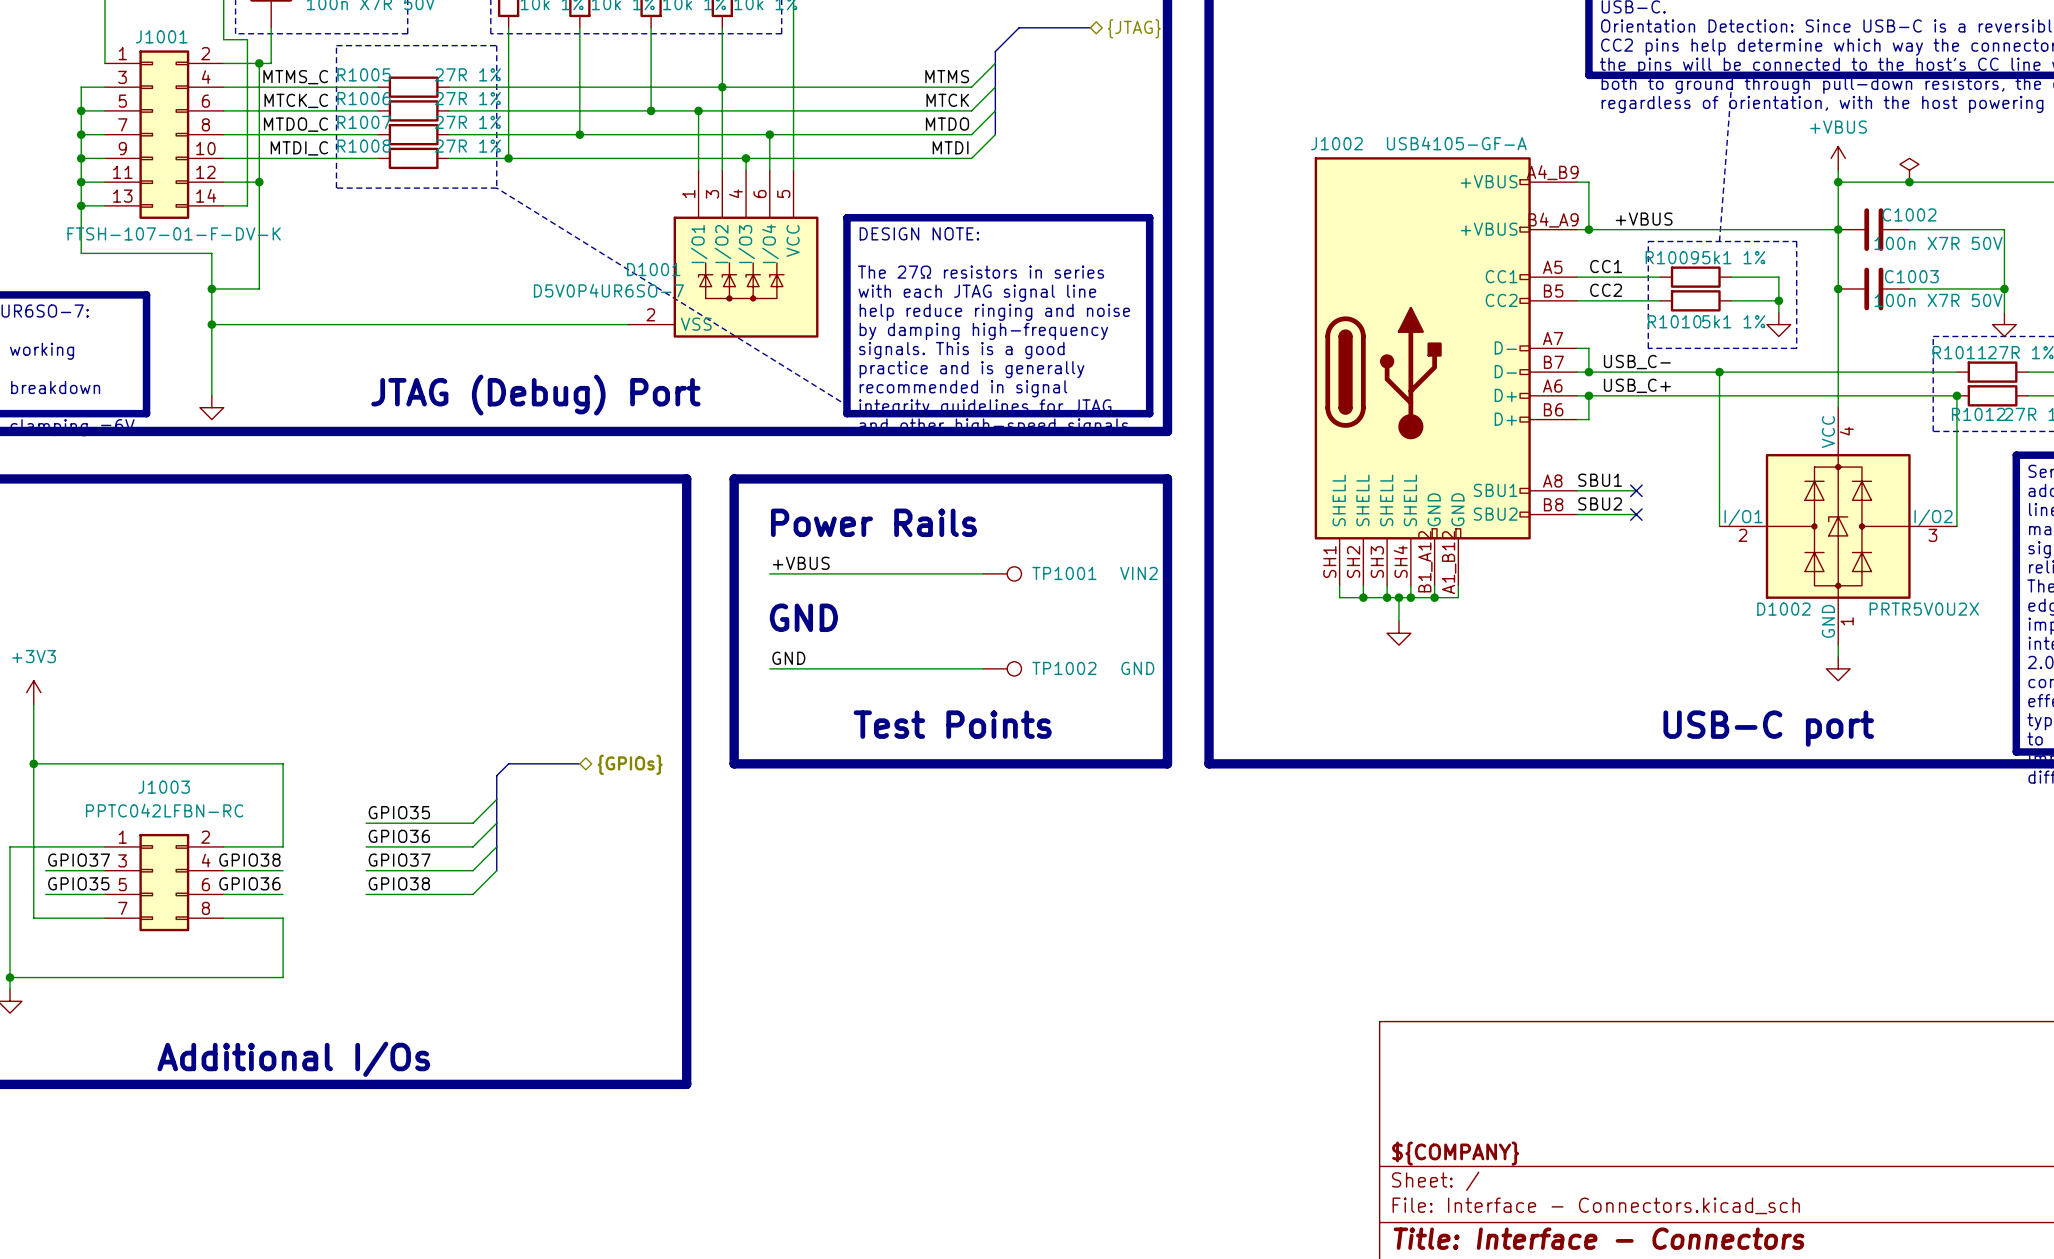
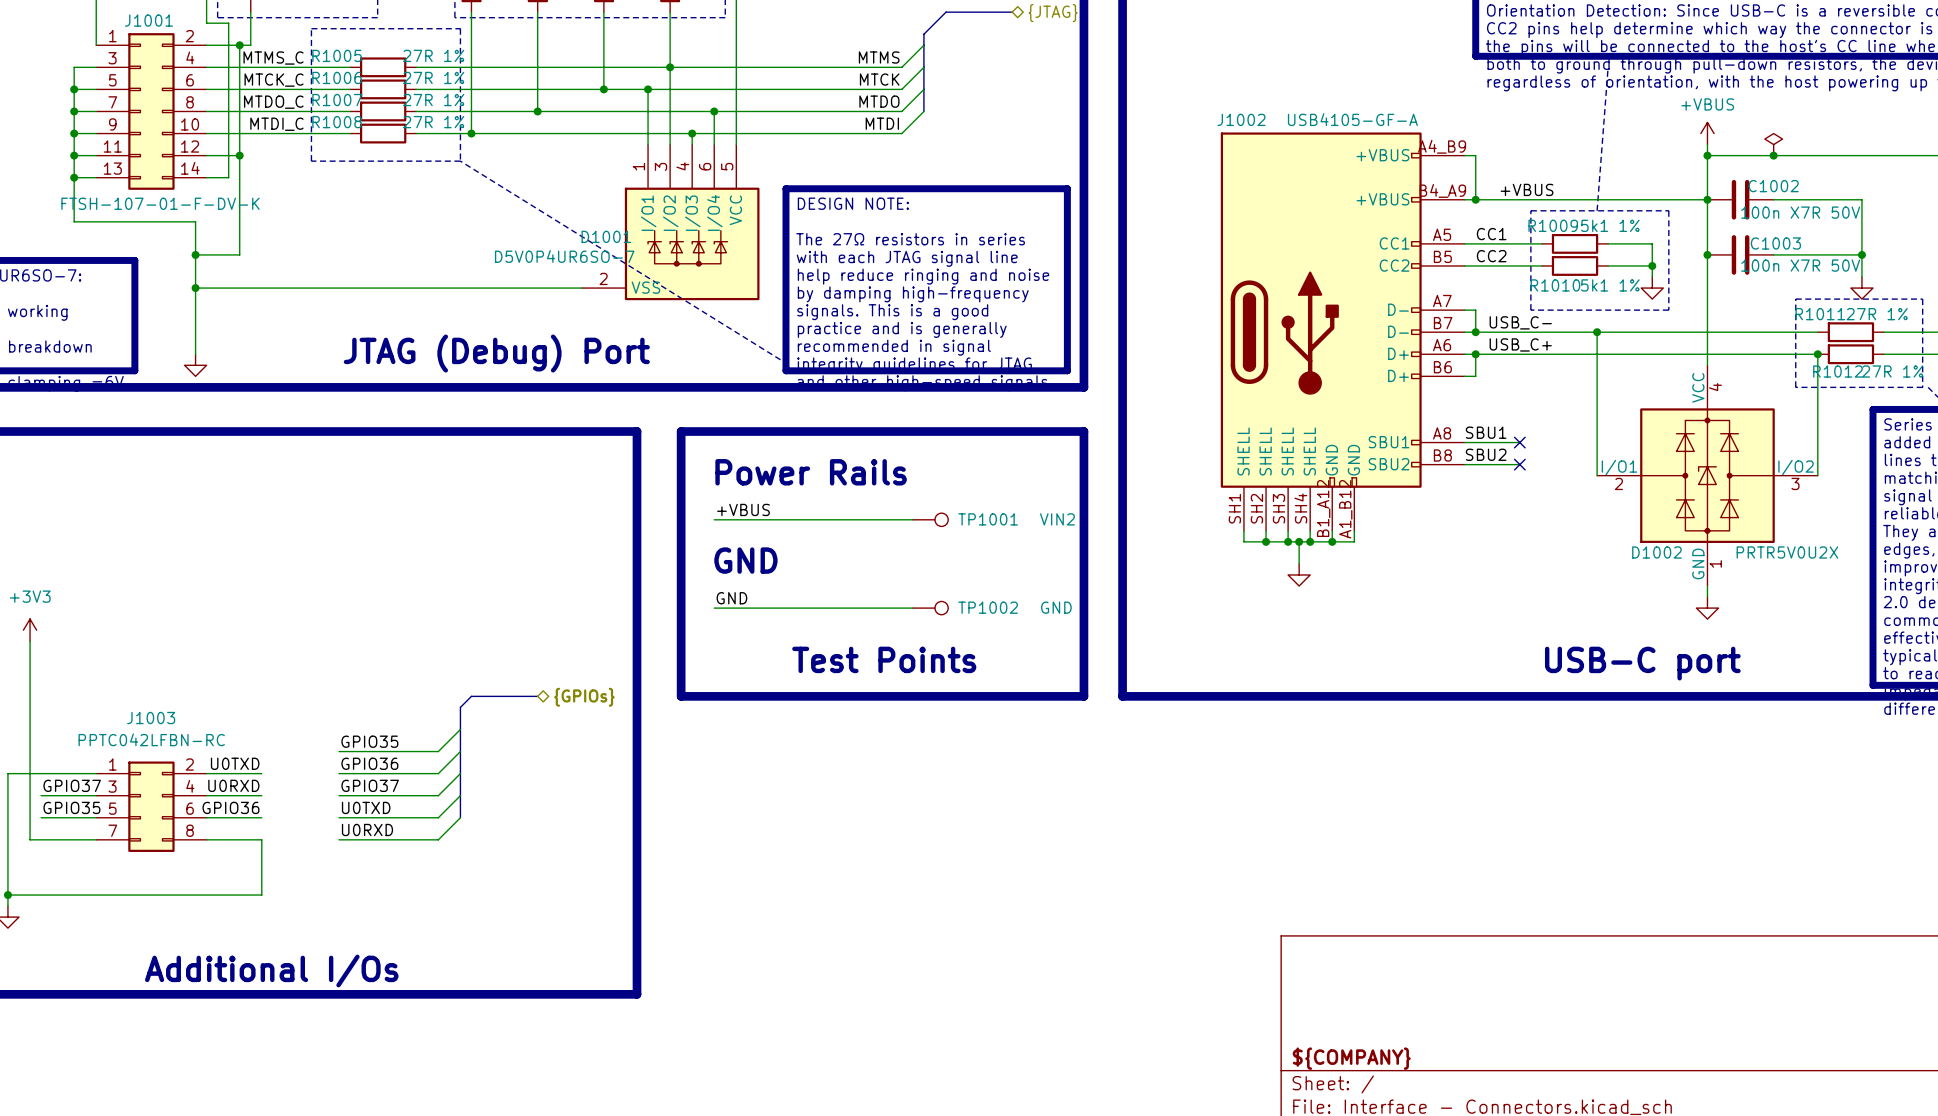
wire: (33, 763) (283, 763) (283, 846) -> none
junction: (33, 763) -> none
label: none -> U0TXD (235, 763)
label: GPIO38 (249, 860) -> U0RXD (233, 785)
bus: none -> (460, 795) (460, 817)
label: GPIO38 (399, 883) -> U0TXD (366, 807)
wire: none -> (460, 817) (438, 839) (339, 839)
label: none -> U0RXD (367, 829)

